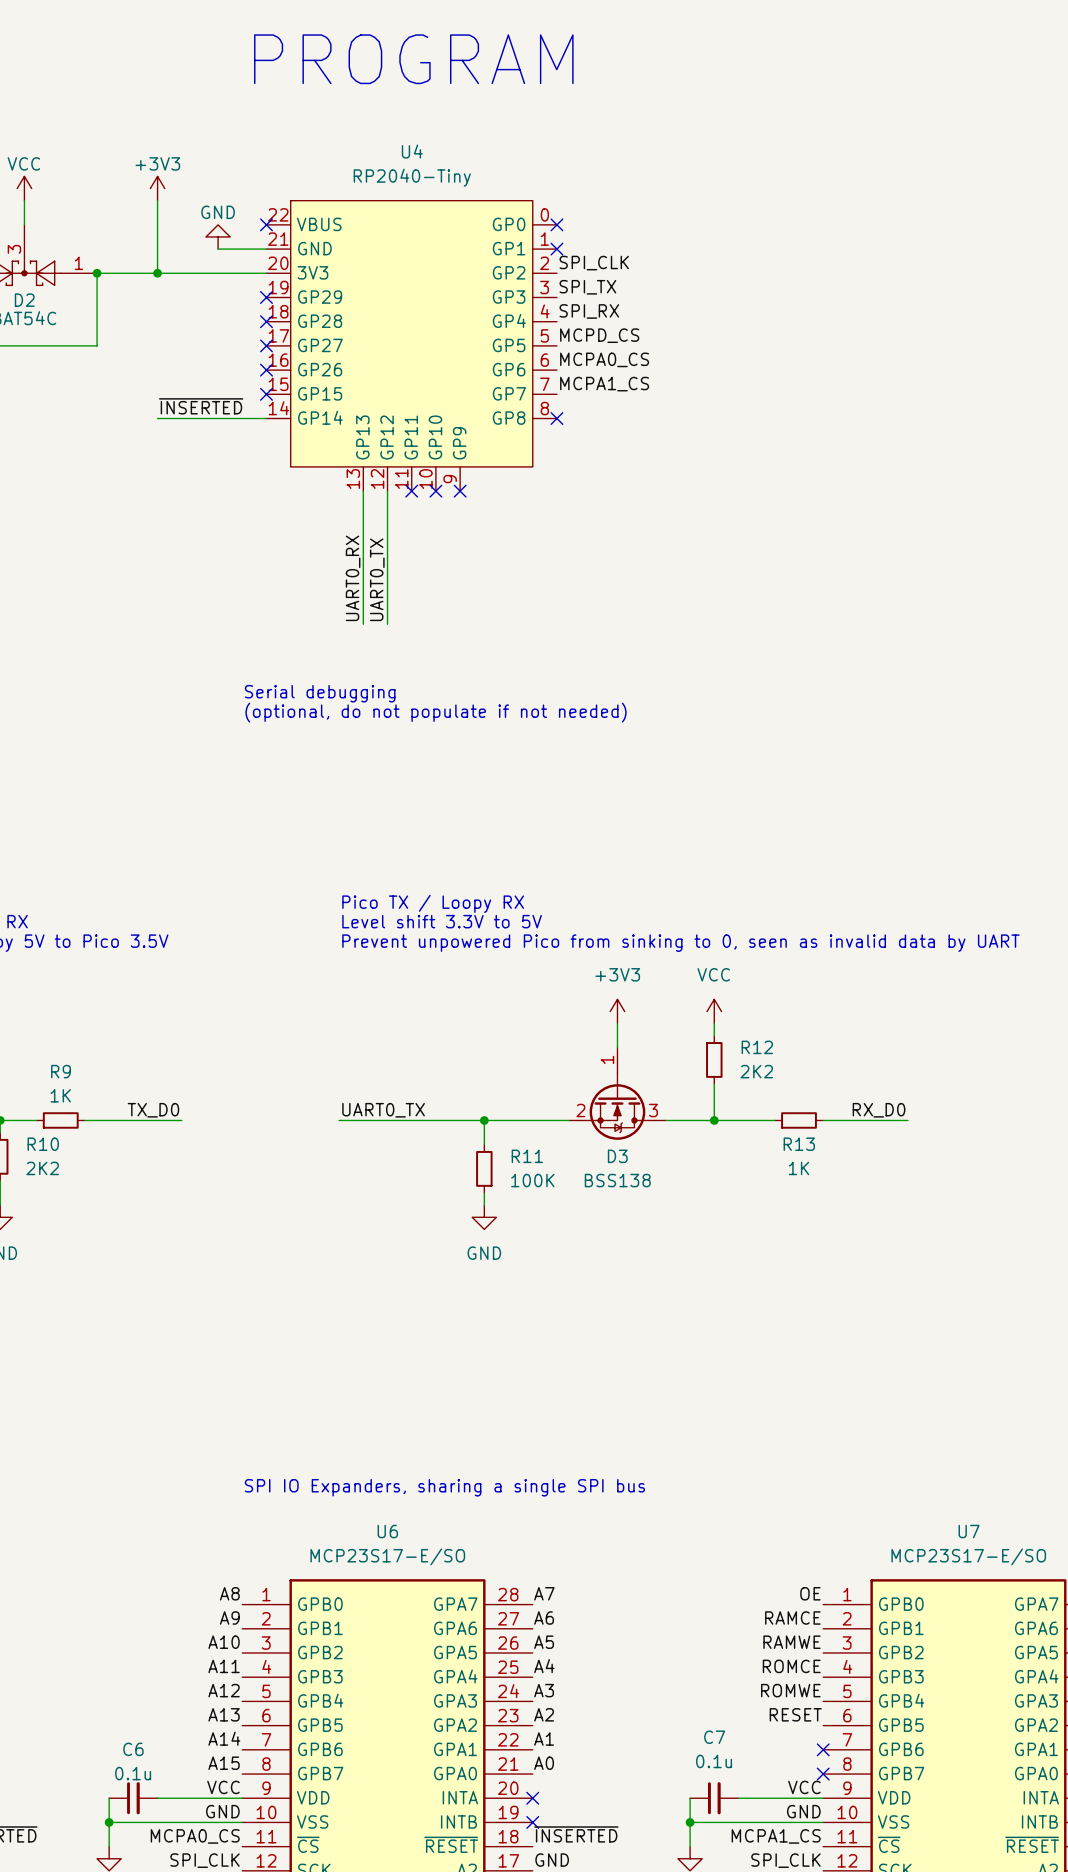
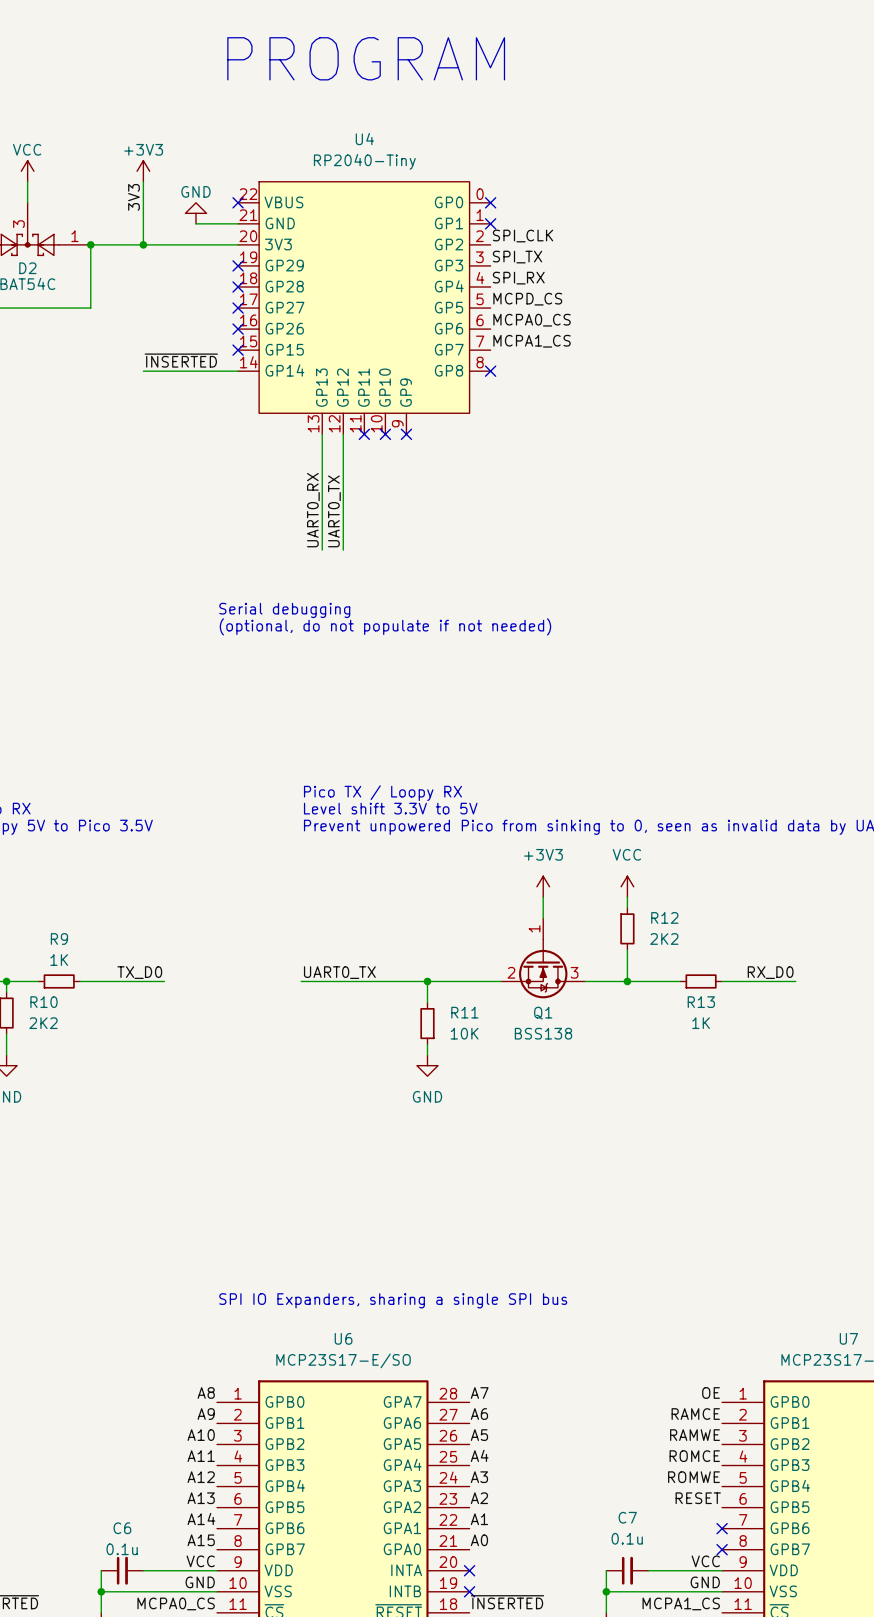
label: none -> 3V3 (133, 197)
D3 name: D3 (617, 1156) -> Q1 (543, 1013)
R11 value: 100K (532, 1180) -> 10K (464, 1033)

